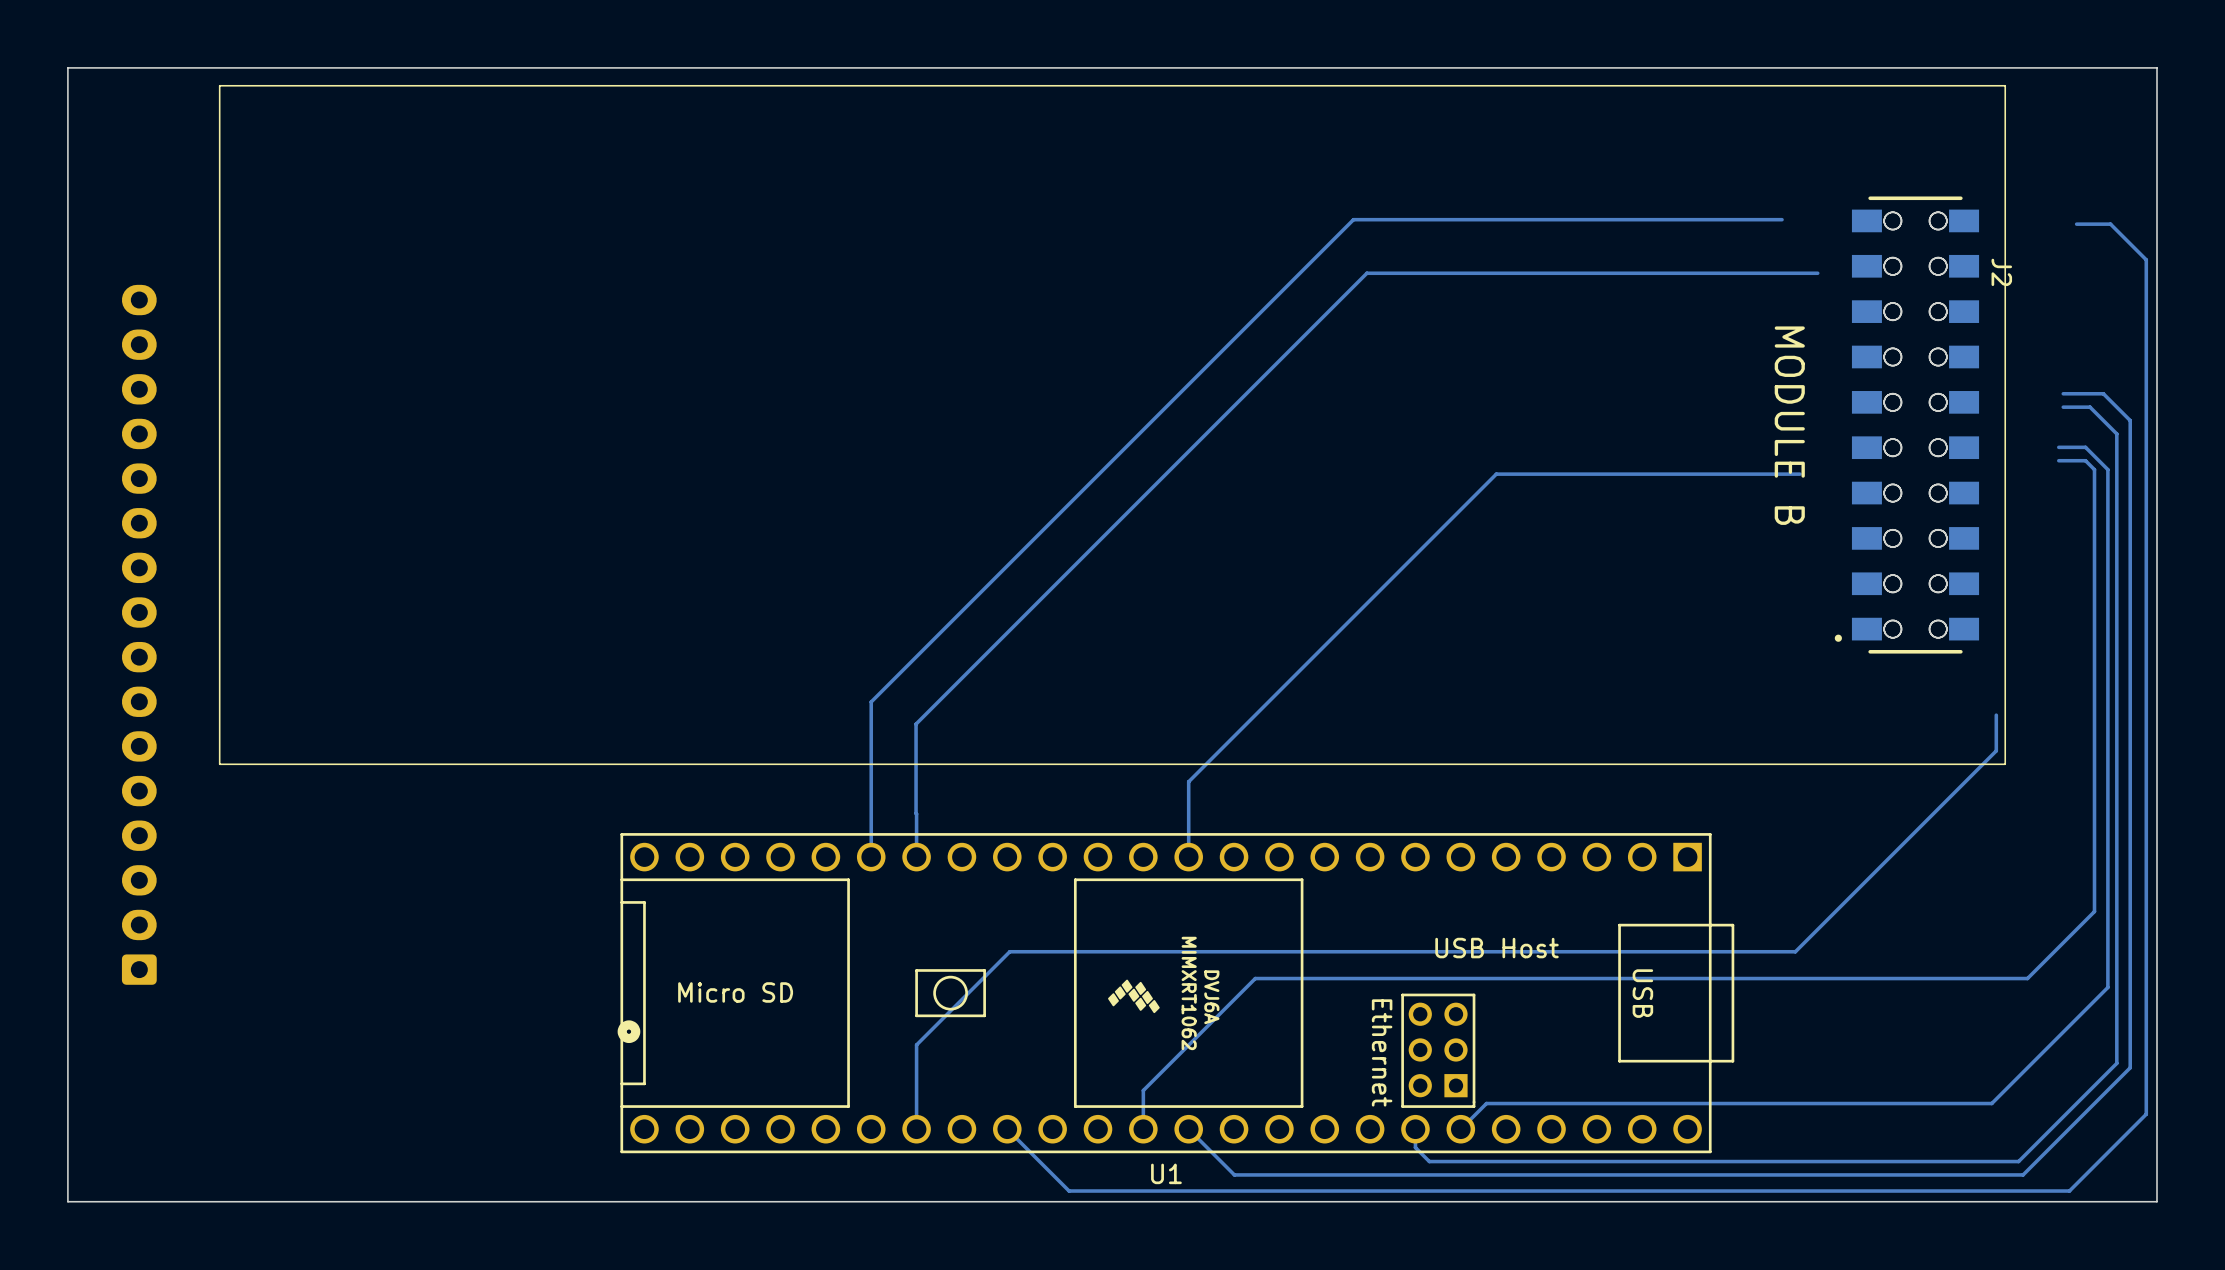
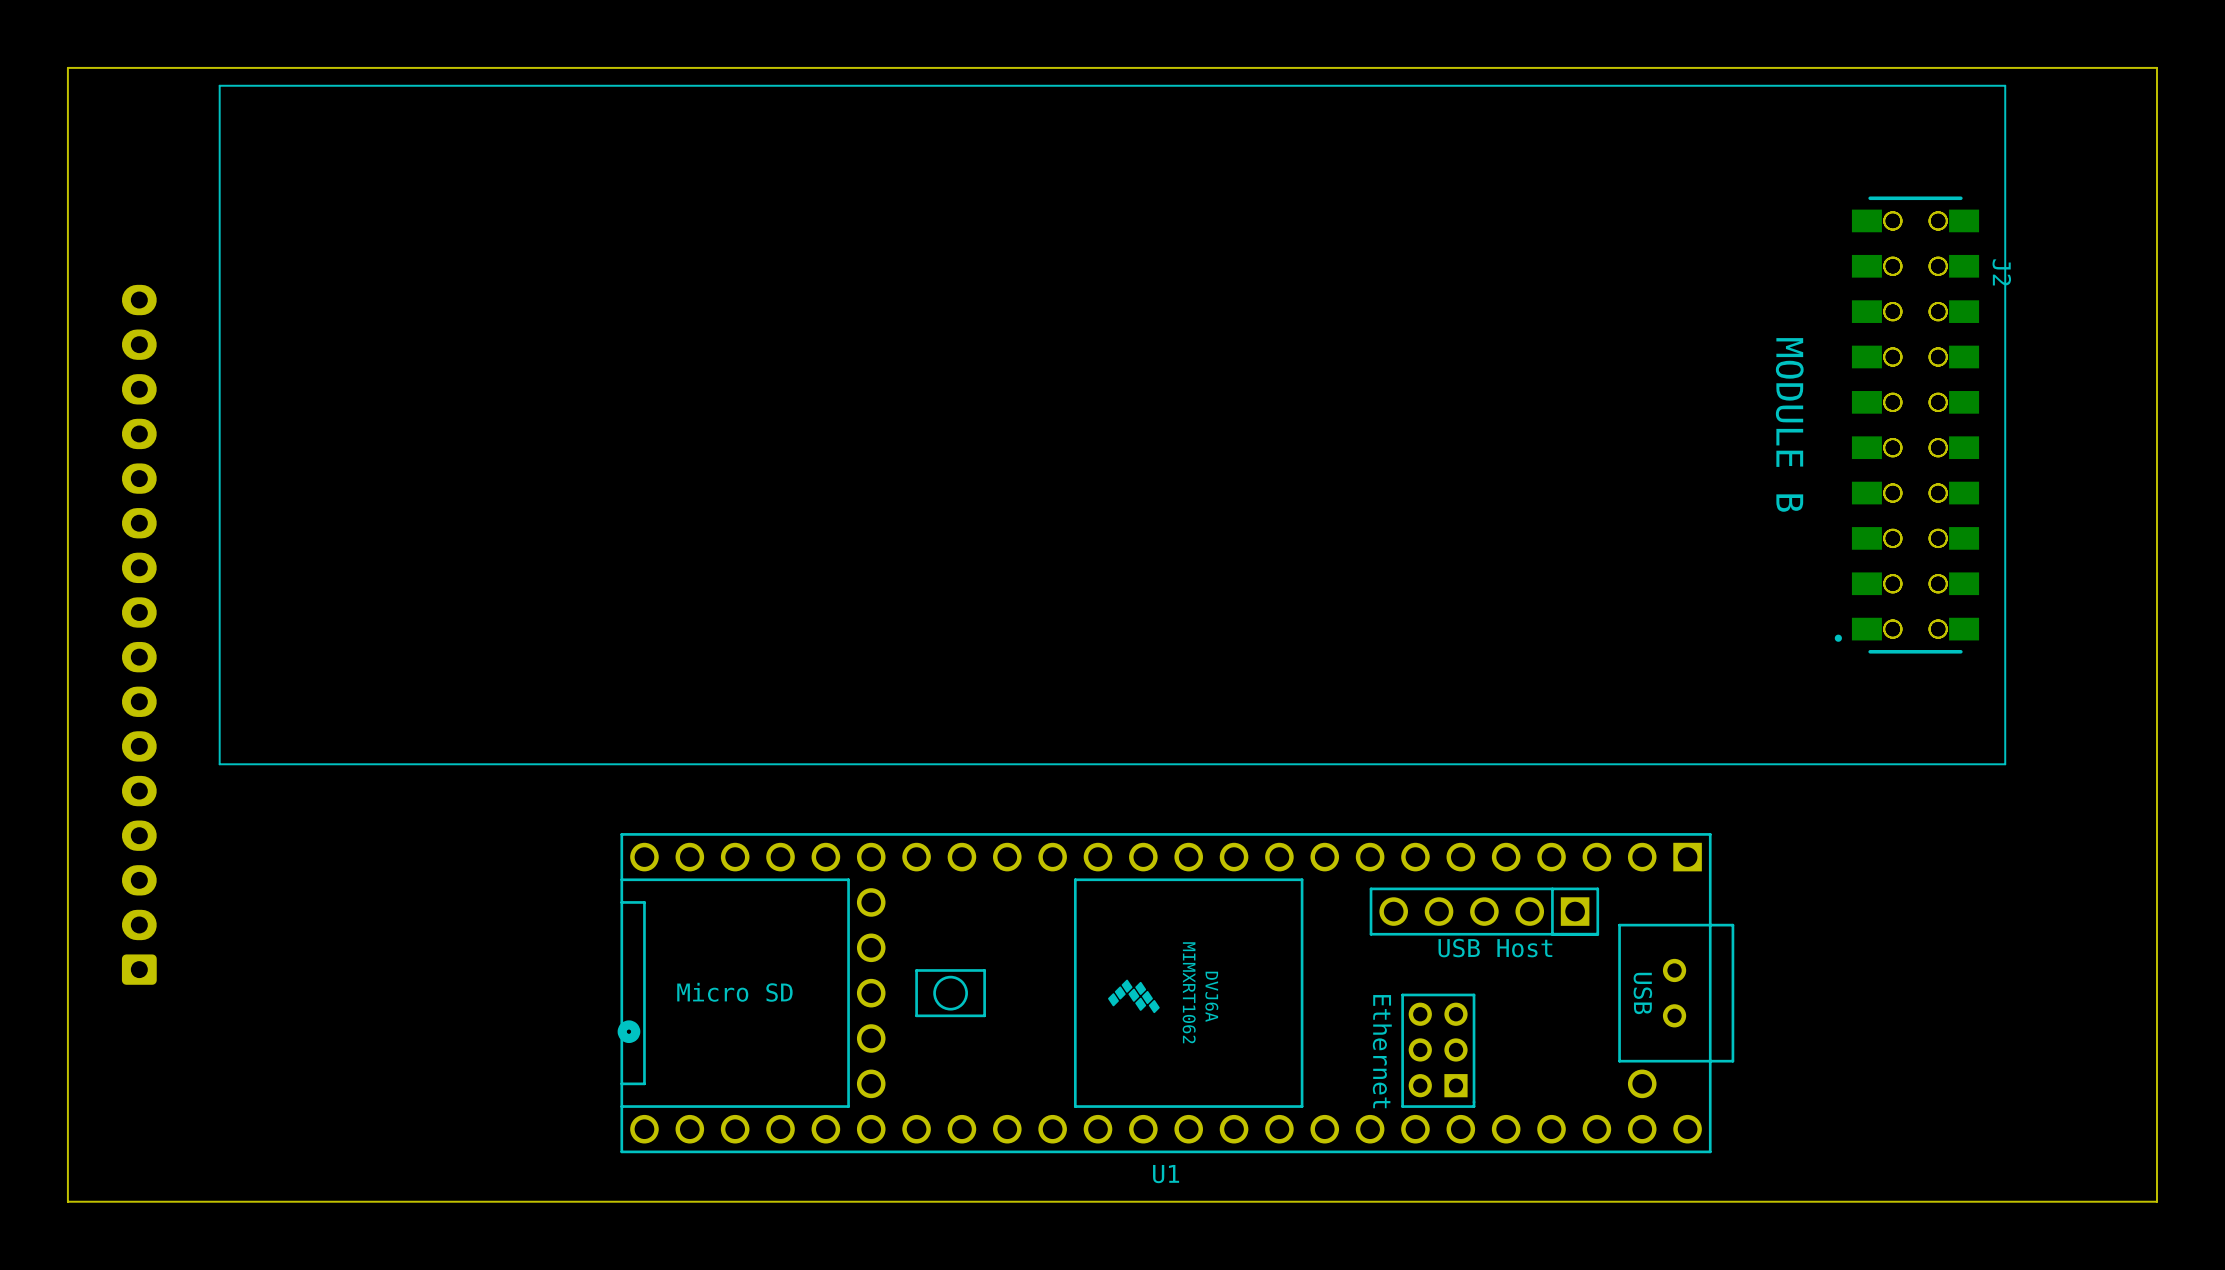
track: (1782, 219) (1353, 219) (871, 701) (871, 857) -> none
track: (2076, 224) (2110, 224) (2146, 259) (2146, 1114) (2069, 1191) (1069, 1191) (1007, 1129) -> none
track: (1817, 273) (1366, 273) (916, 724) (916, 857) -> none
track: (2063, 393) (2103, 393) (2130, 420) (2130, 1067) (2023, 1174) (1234, 1174) (1188, 1129) -> none
track: (2063, 407) (2090, 407) (2116, 433) (2116, 1063) (2018, 1161) (1429, 1161) (1415, 1147) (1415, 1129) -> none
track: (2058, 447) (2085, 447) (2107, 469) (2107, 987) (1991, 1103) (1486, 1103) (1460, 1129) -> none
track: (2058, 460) (2085, 460) (2094, 469) (2094, 911) (2027, 978) (1255, 978) (1143, 1090) (1143, 1129) -> none
track: (1799, 474) (1496, 474) (1188, 781) (1188, 857) -> none
track: (1996, 715) (1996, 750) (1795, 951) (1009, 951) (916, 1044) (916, 1129) -> none
U1 footprint: [620, 833, 1735, 1154] -> [620, 833, 1735, 1154]

